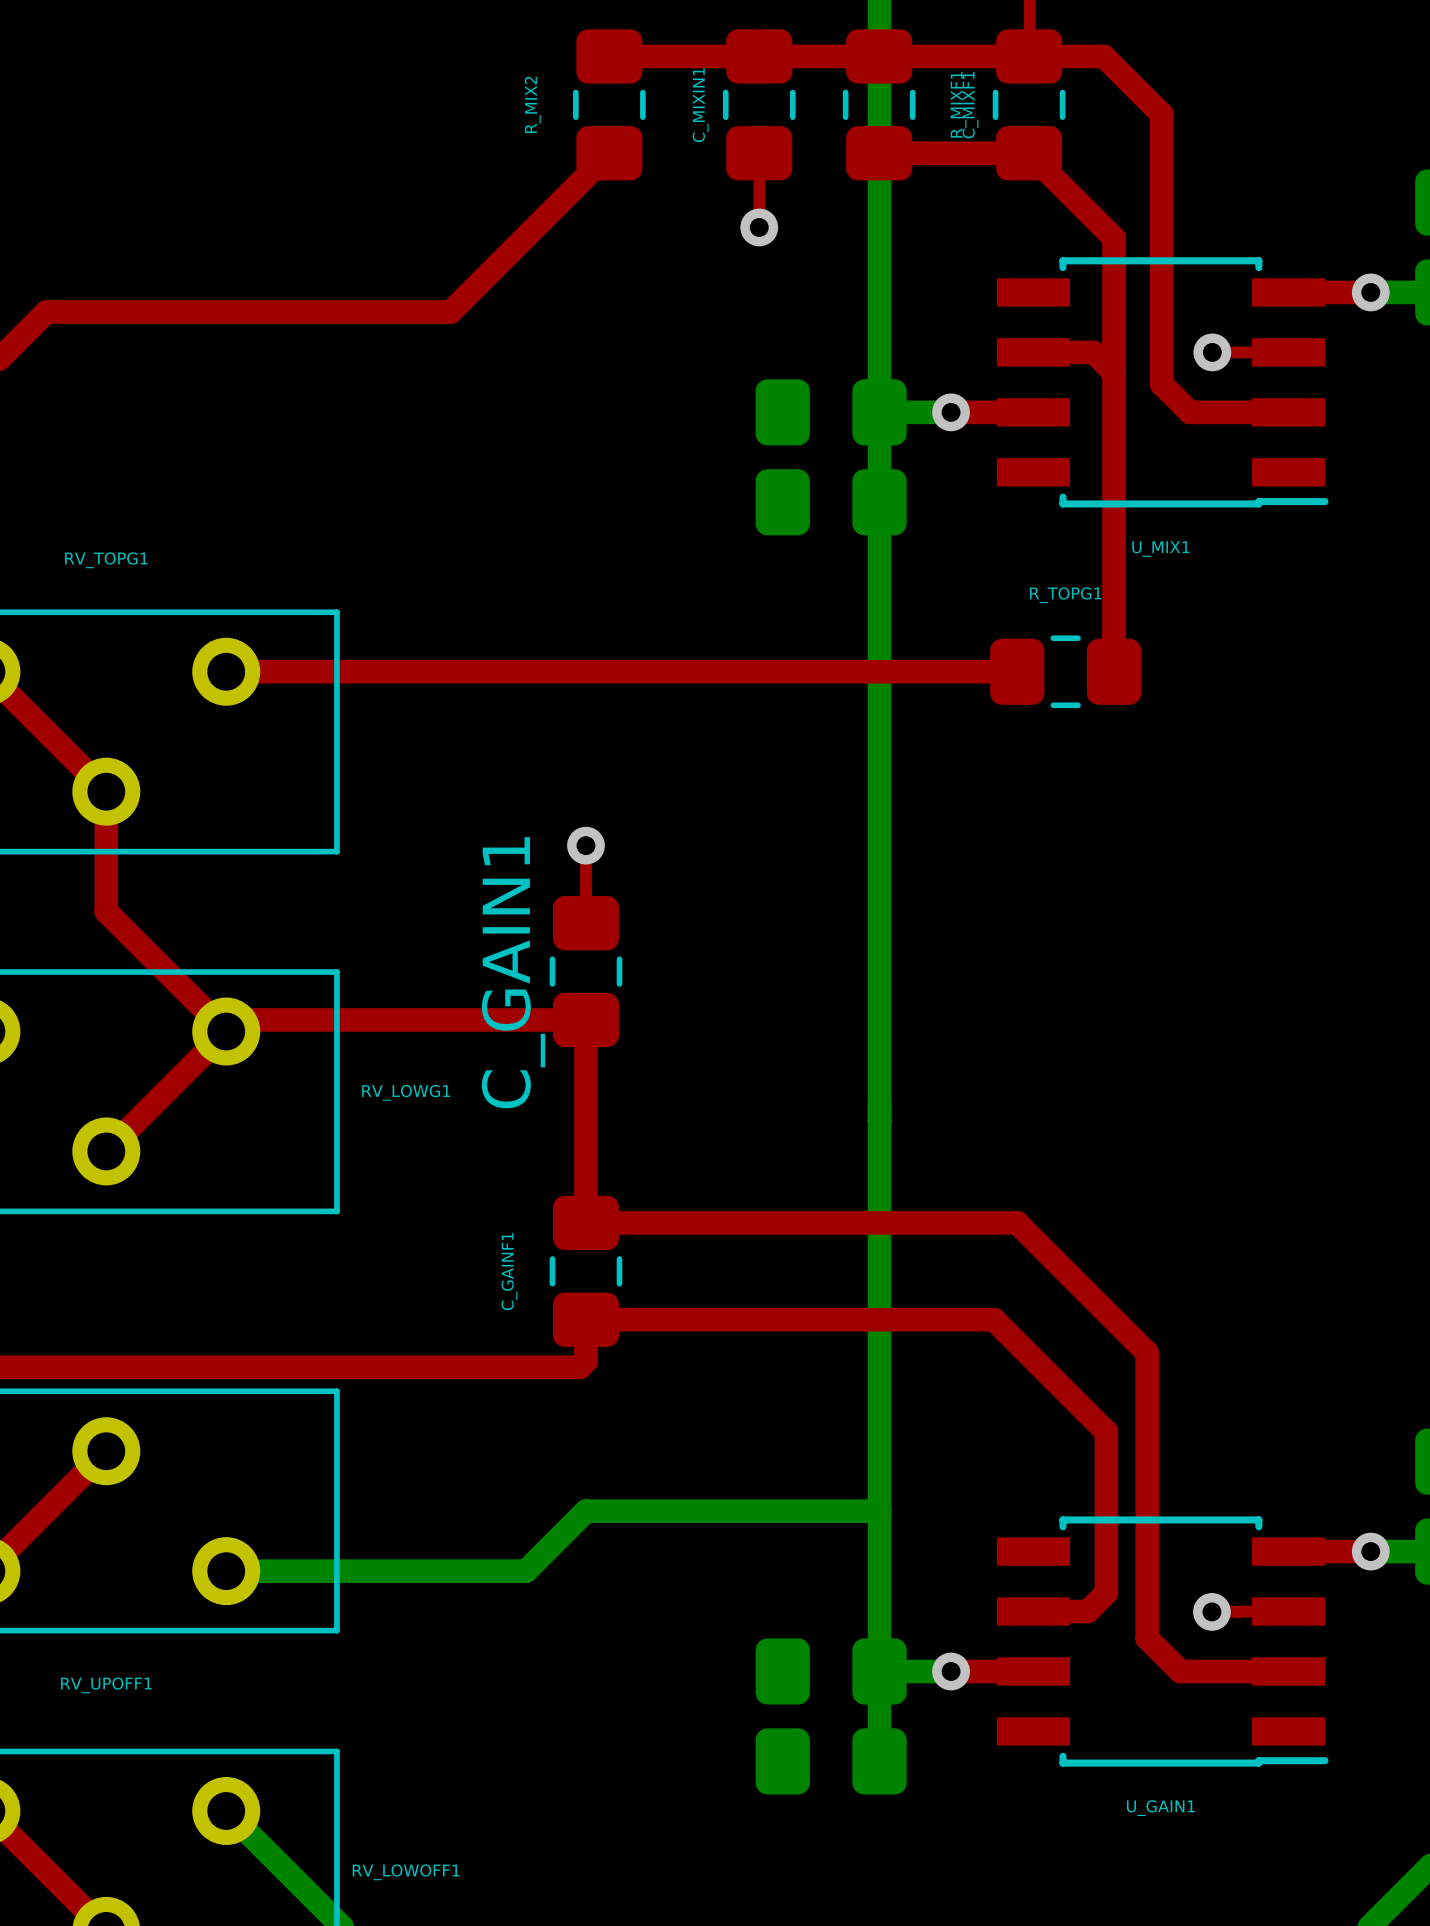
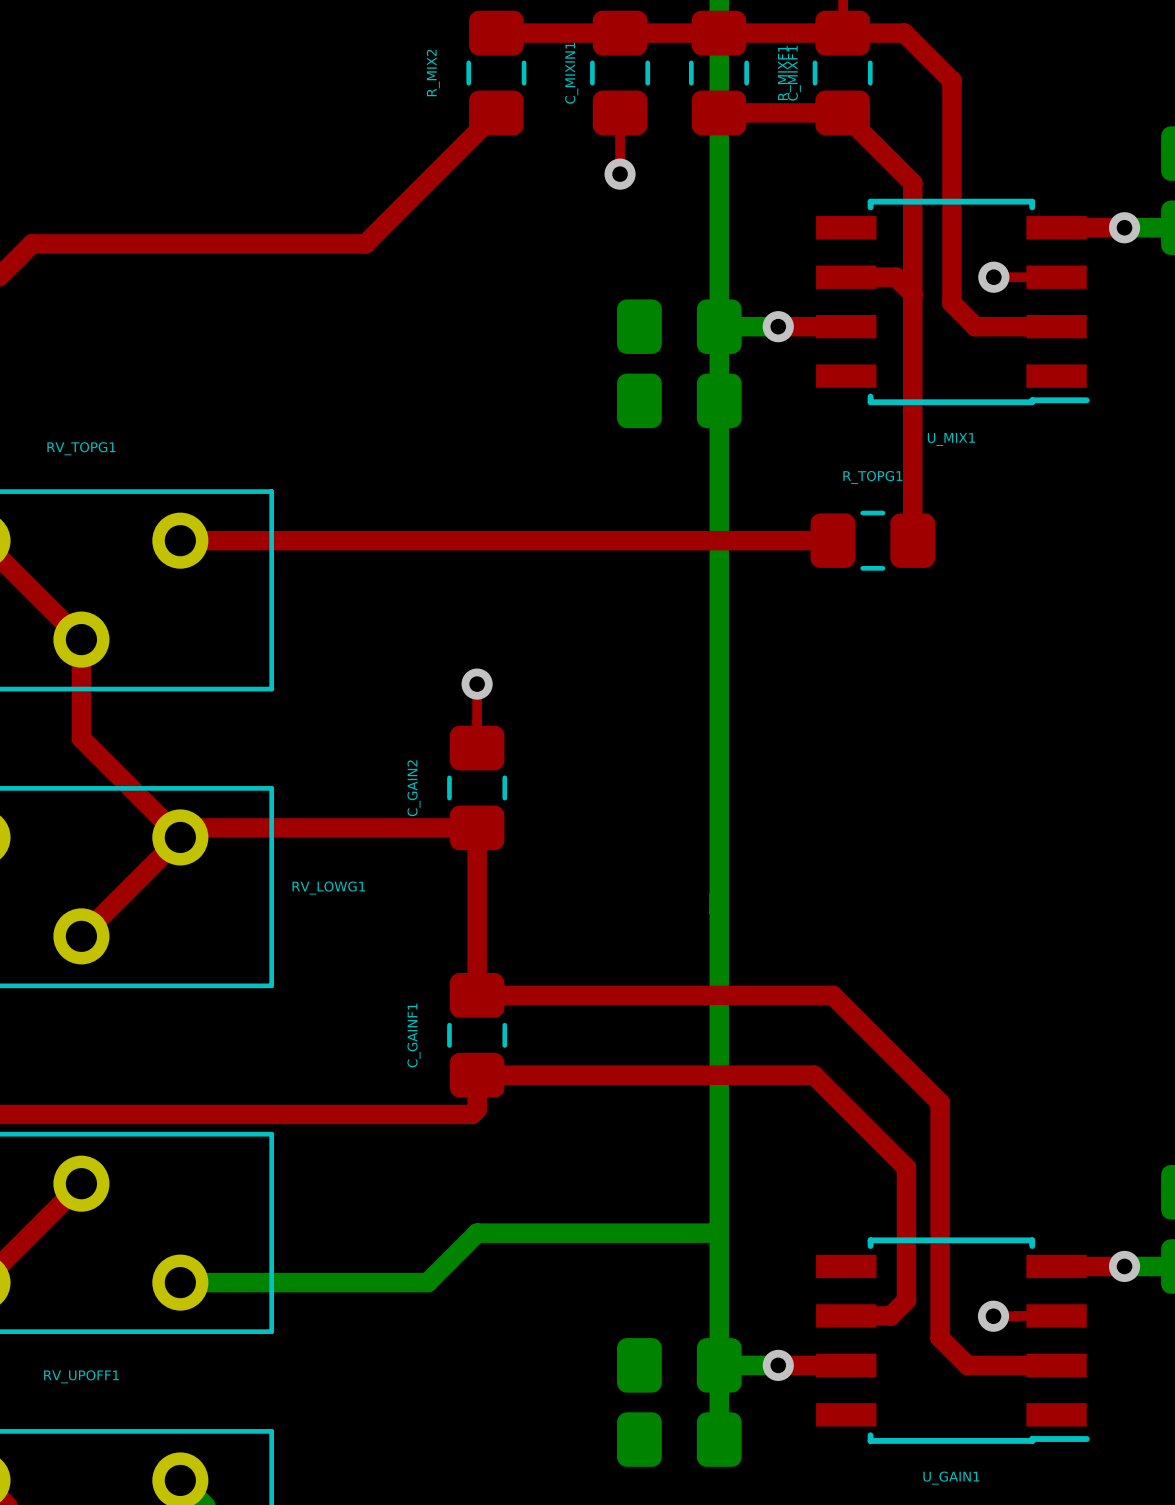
C_GAIN1 name: C_GAIN1 (513, 972) -> C_GAIN2 (413, 788)

